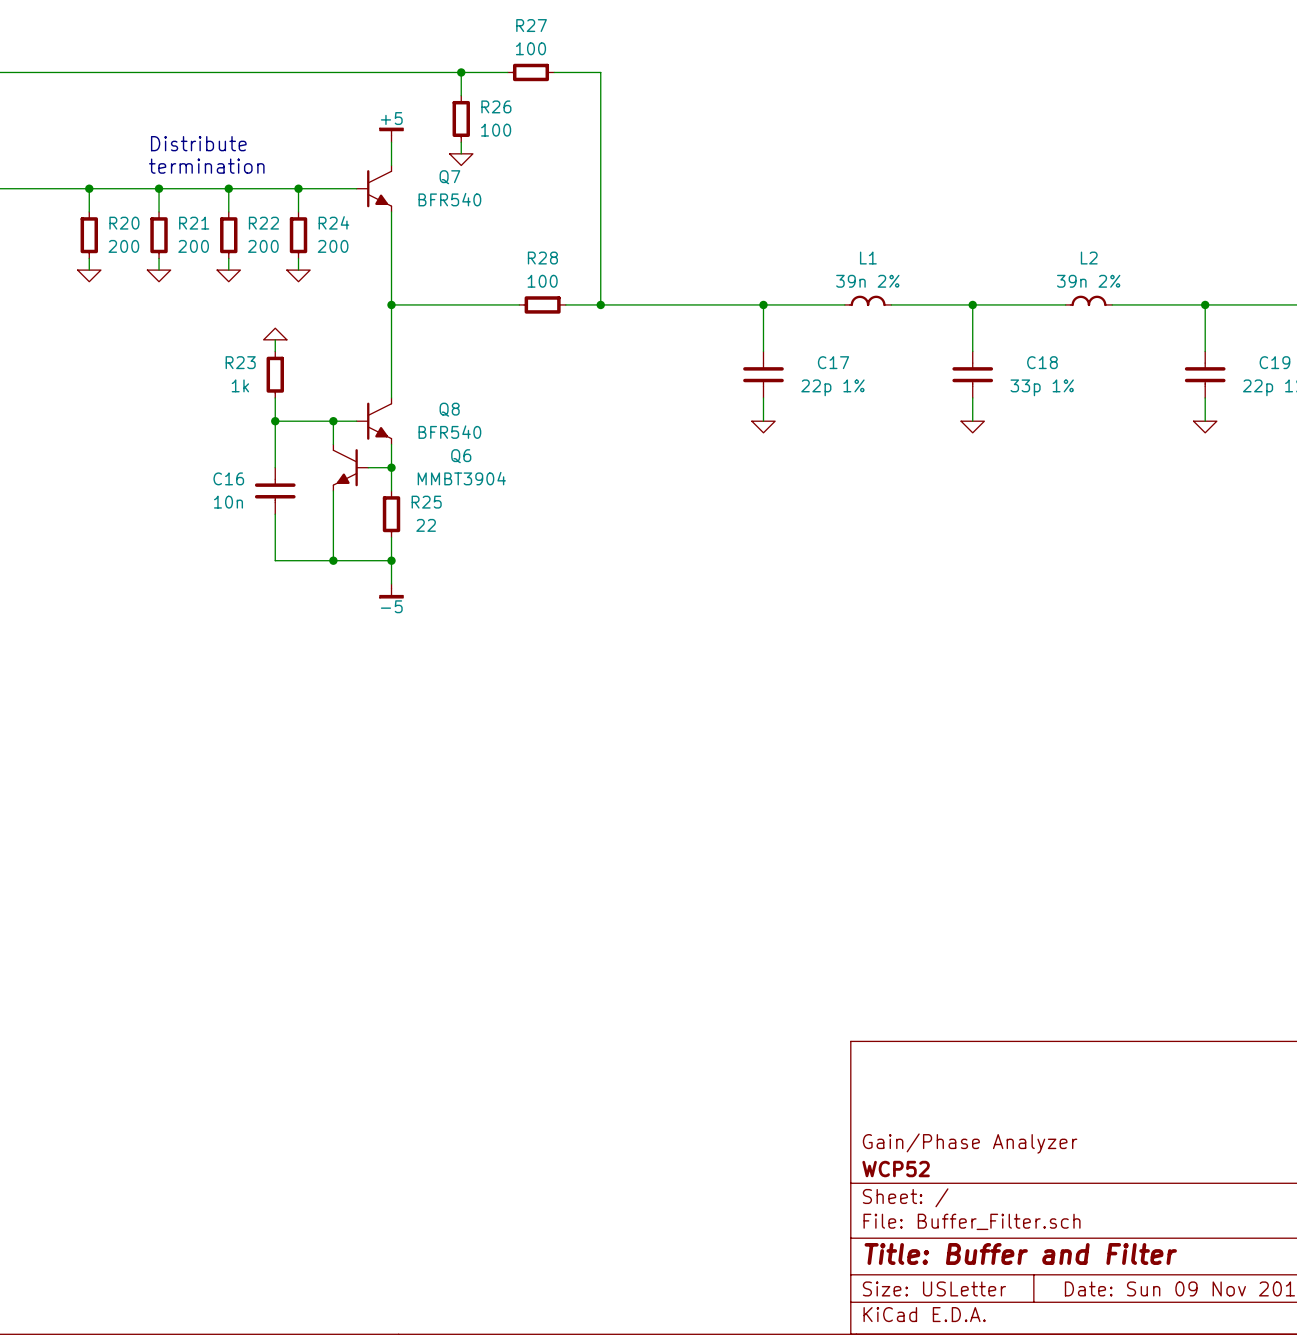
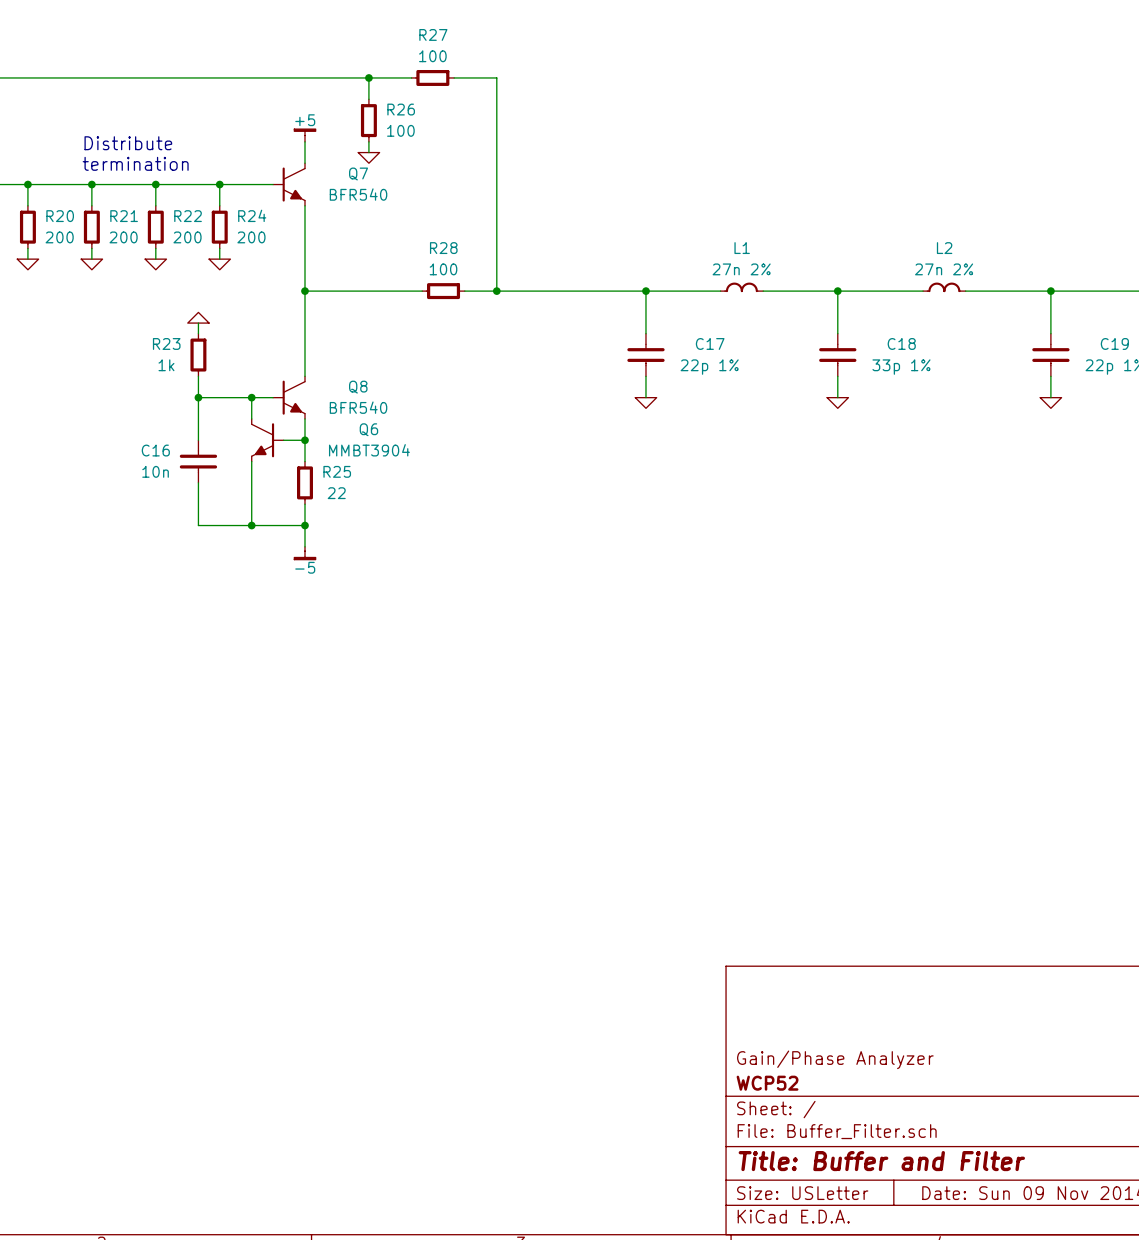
L1 value: 39n 2% (867, 281) -> 27n 2% (741, 269)
L2 value: 39n 2% (1088, 281) -> 27n 2% (944, 269)

